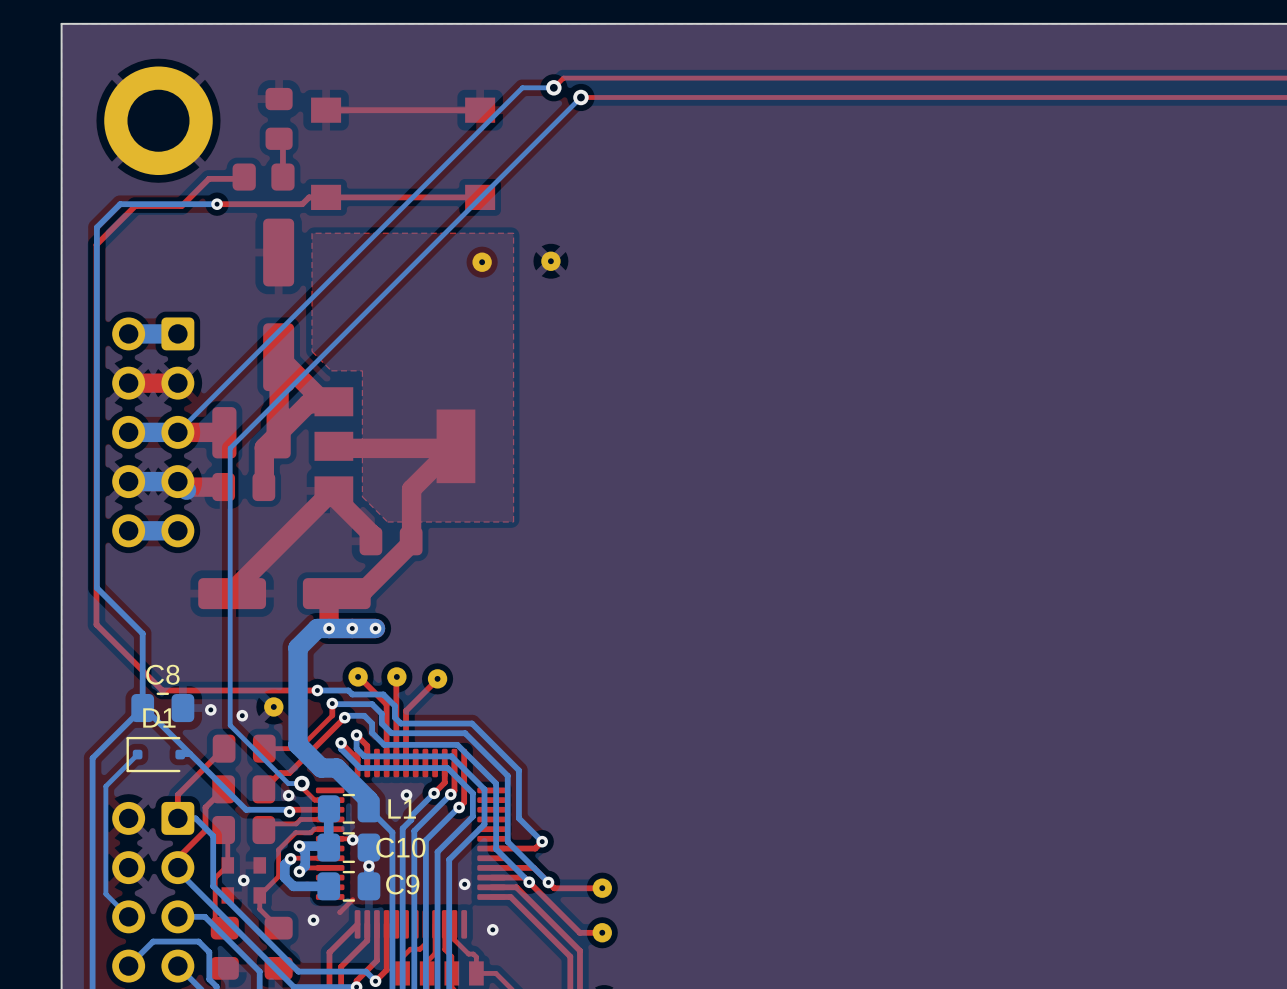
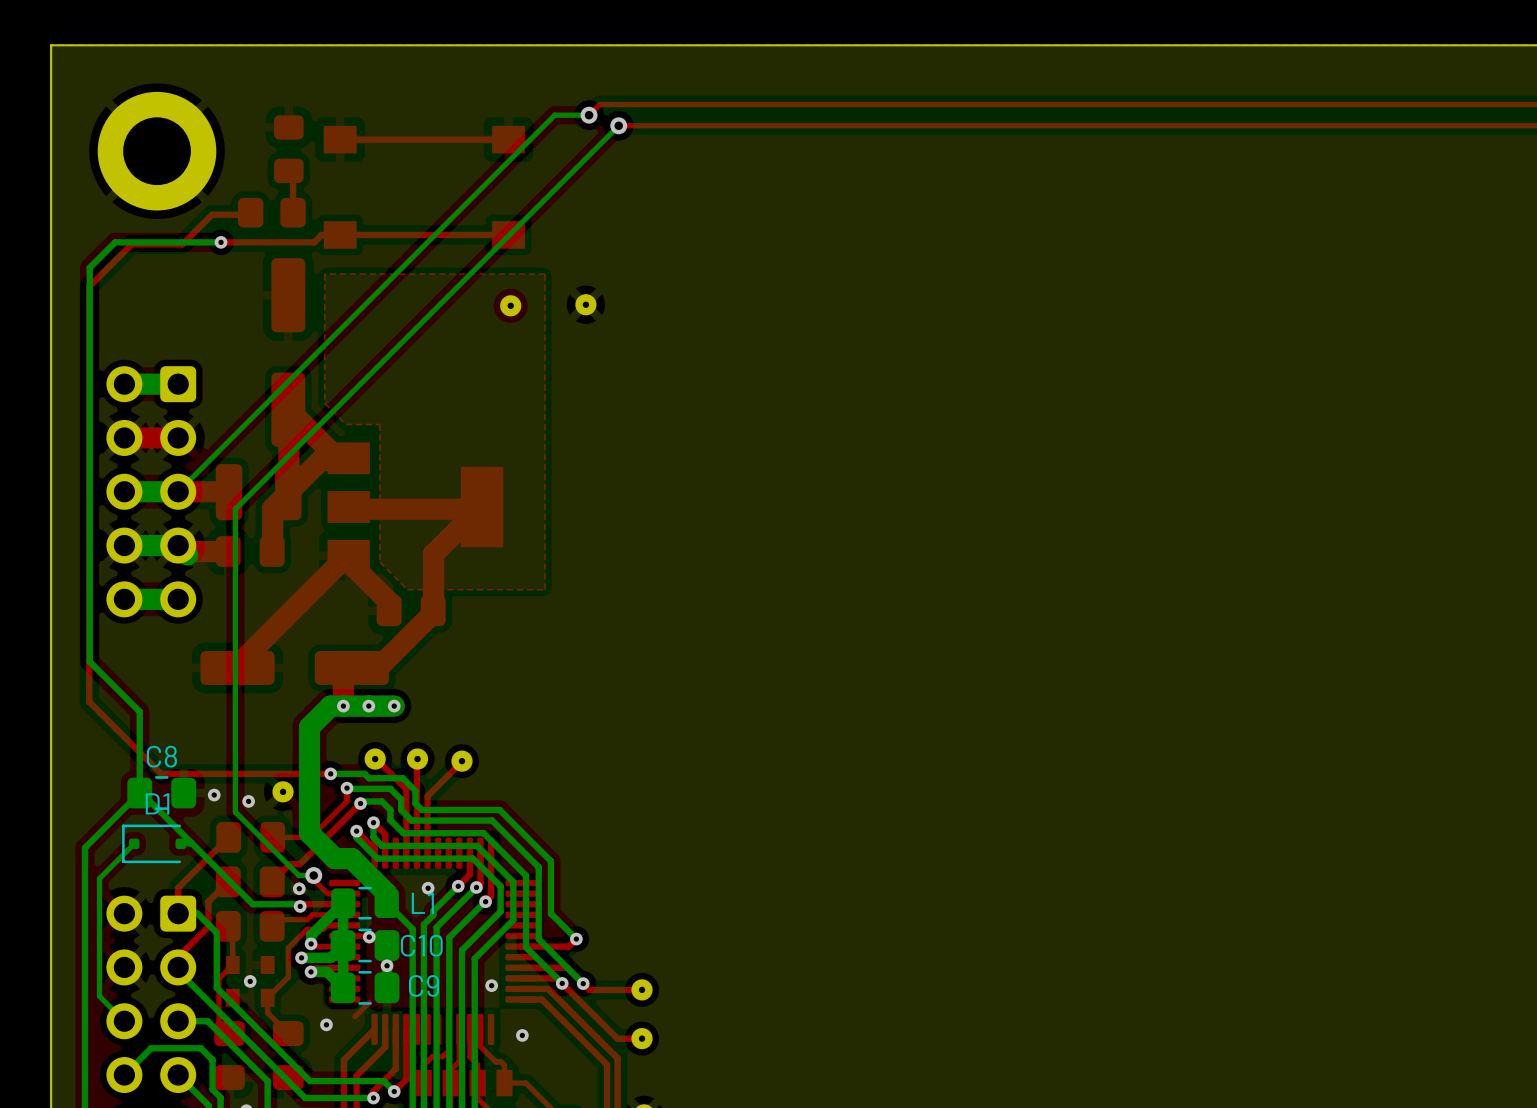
bottom track: none -> (343, 903) (311, 935) (311, 943)
bottom track: (327, 846) (299, 846) (305, 851) (305, 865) (299, 871) -> none
bottom track: (290, 858) (284, 864) (284, 877) (293, 886) (328, 886) -> (301, 957) (330, 957) (343, 945) (343, 987) (327, 971) (311, 971)

